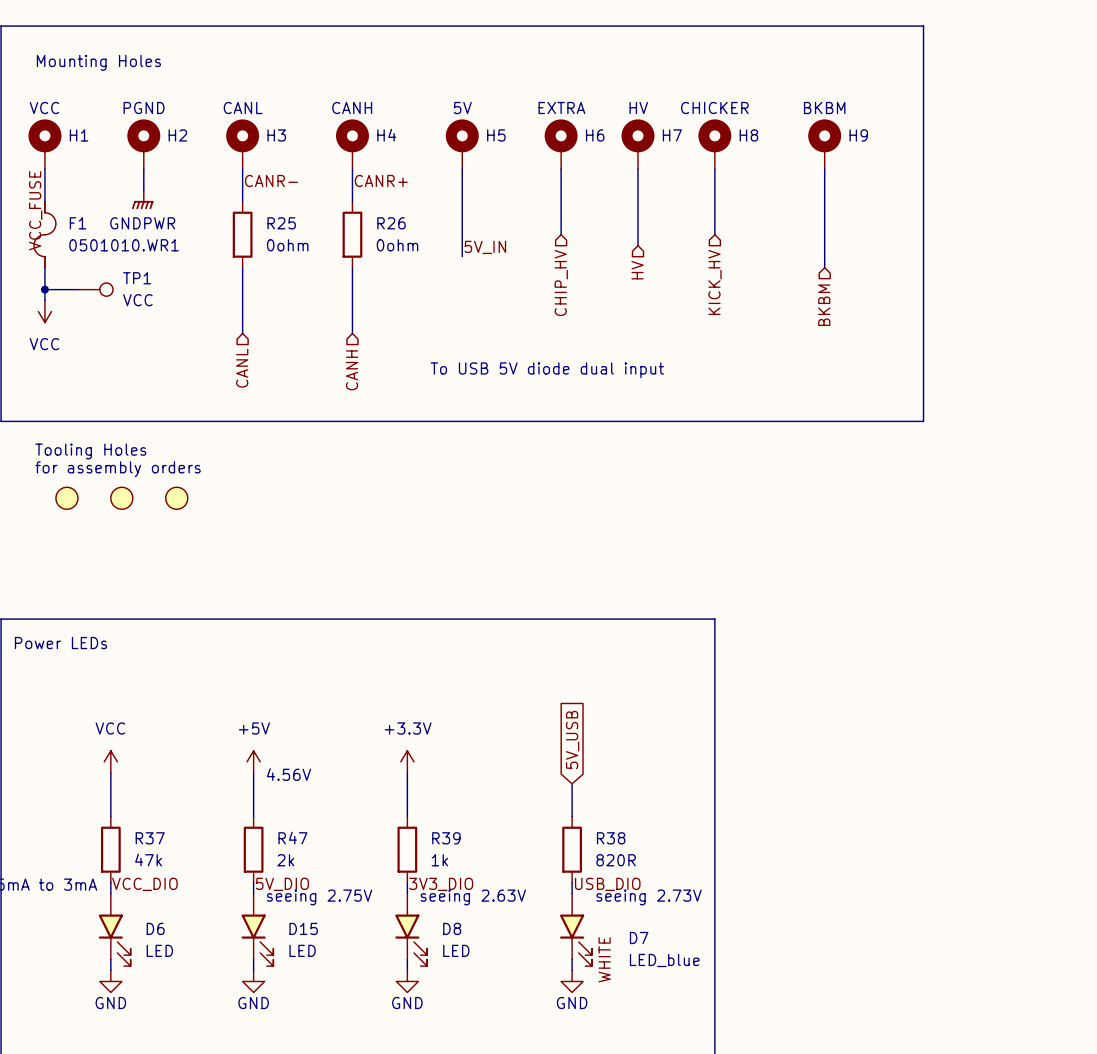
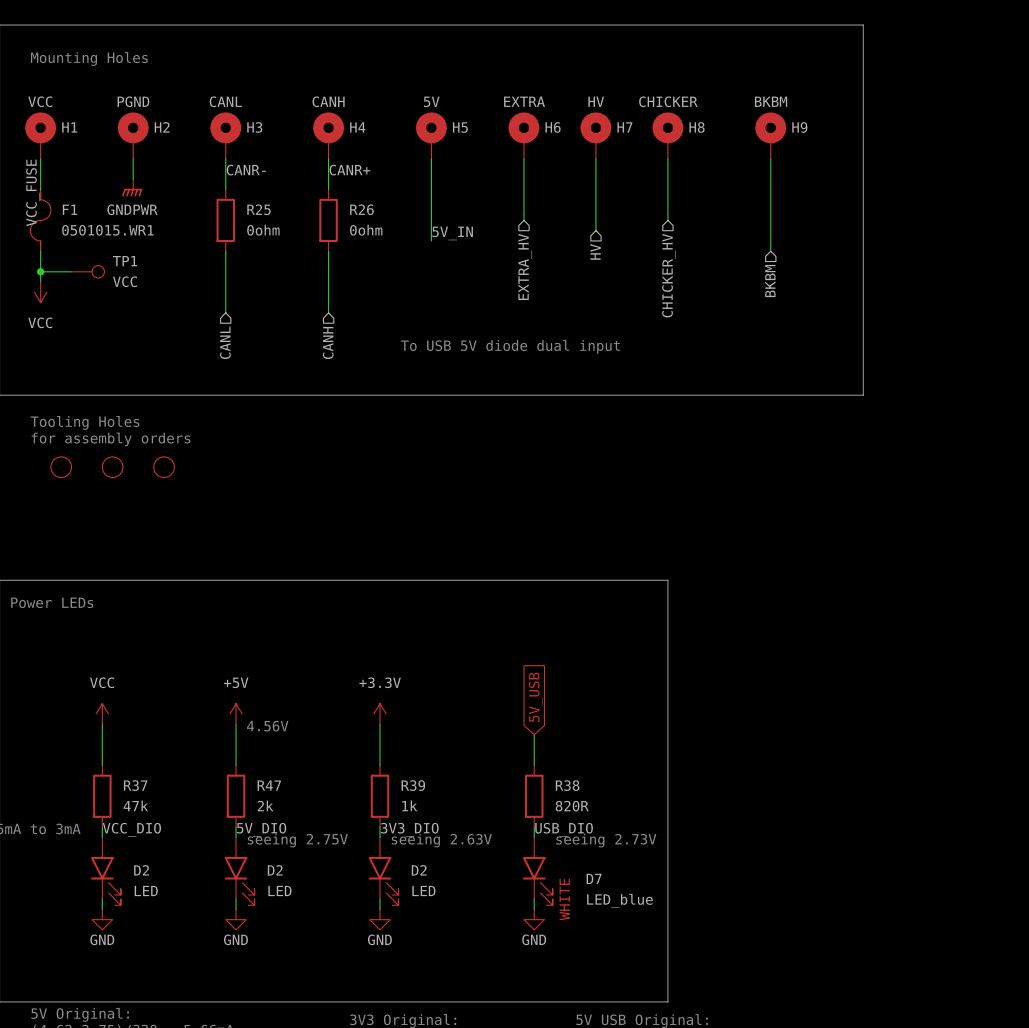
F1 value: 0501010.WR1 (124, 245) -> 0501015.WR1 (107, 230)
hierarchical label: CHIP_HV (561, 282) -> EXTRA_HV (525, 266)
hierarchical label: KICK_HV (714, 282) -> CHICKER_HV (669, 275)
D6 name: D6 (155, 928) -> D2 (141, 870)
D15 name: D15 (303, 928) -> D2 (275, 870)
D8 name: D8 (452, 928) -> D2 (419, 870)

